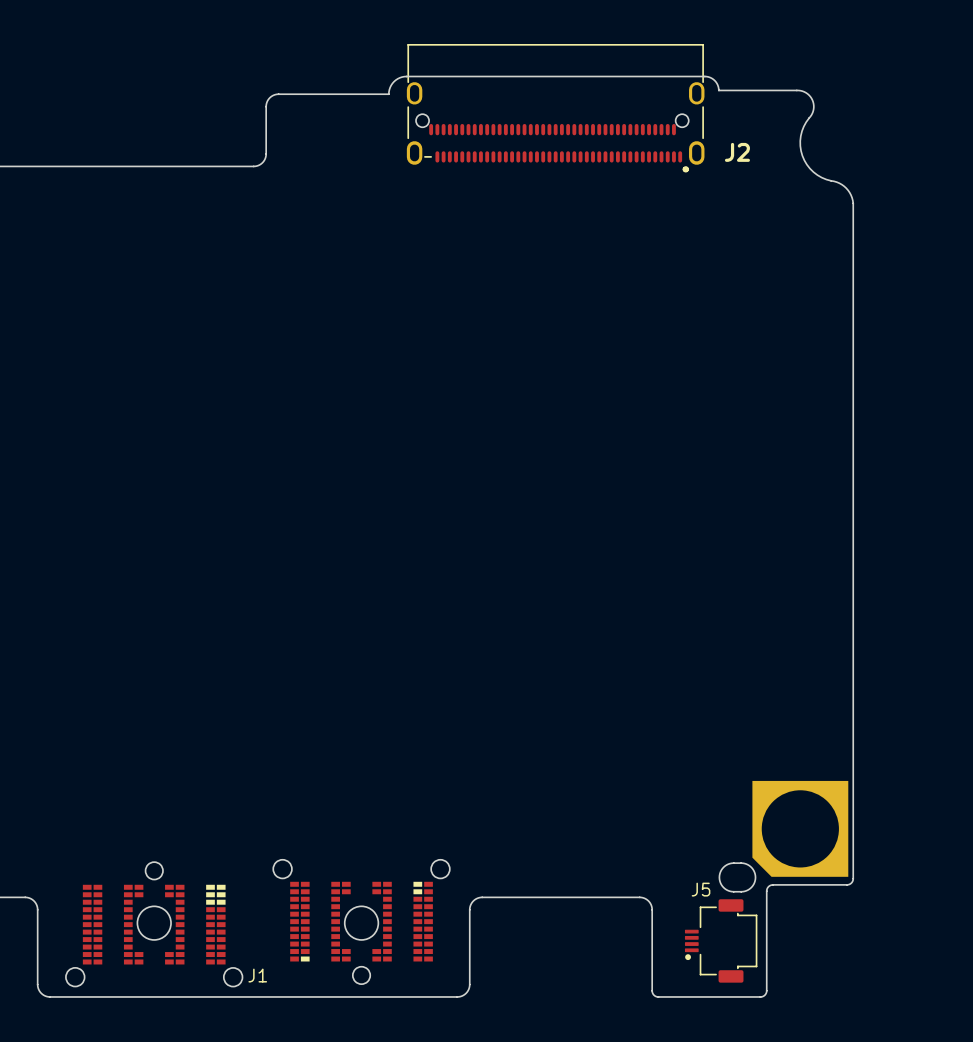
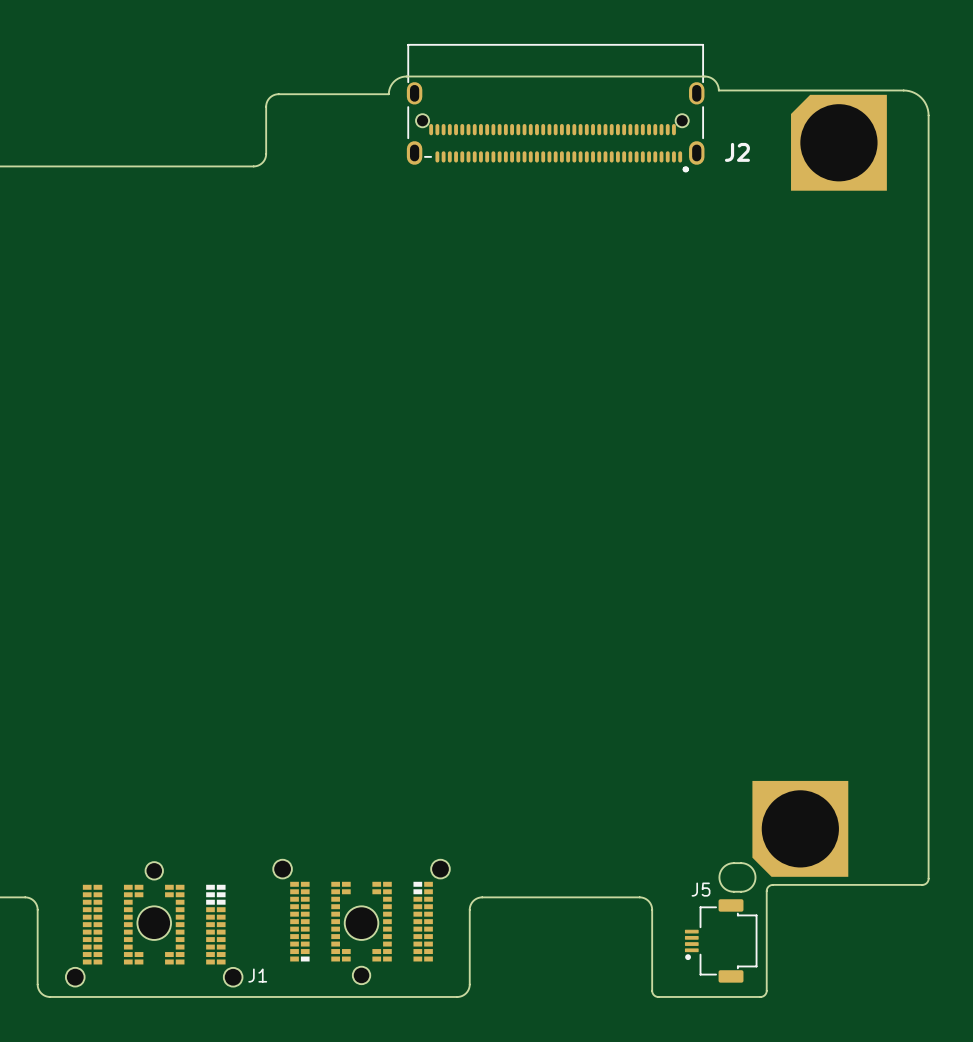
board edge: (796, 90) (807, 93) (813, 105) (812, 113) (803, 126) (800, 136) (801, 150) (804, 160) (817, 175) (844, 186) (849, 192) (853, 203) (853, 878) (851, 882) (847, 884) (772, 884) -> (796, 90) (906, 90) (921, 97) (928, 112) (928, 878) (926, 883) (922, 884) (772, 884)
part: none -> (838, 142)

